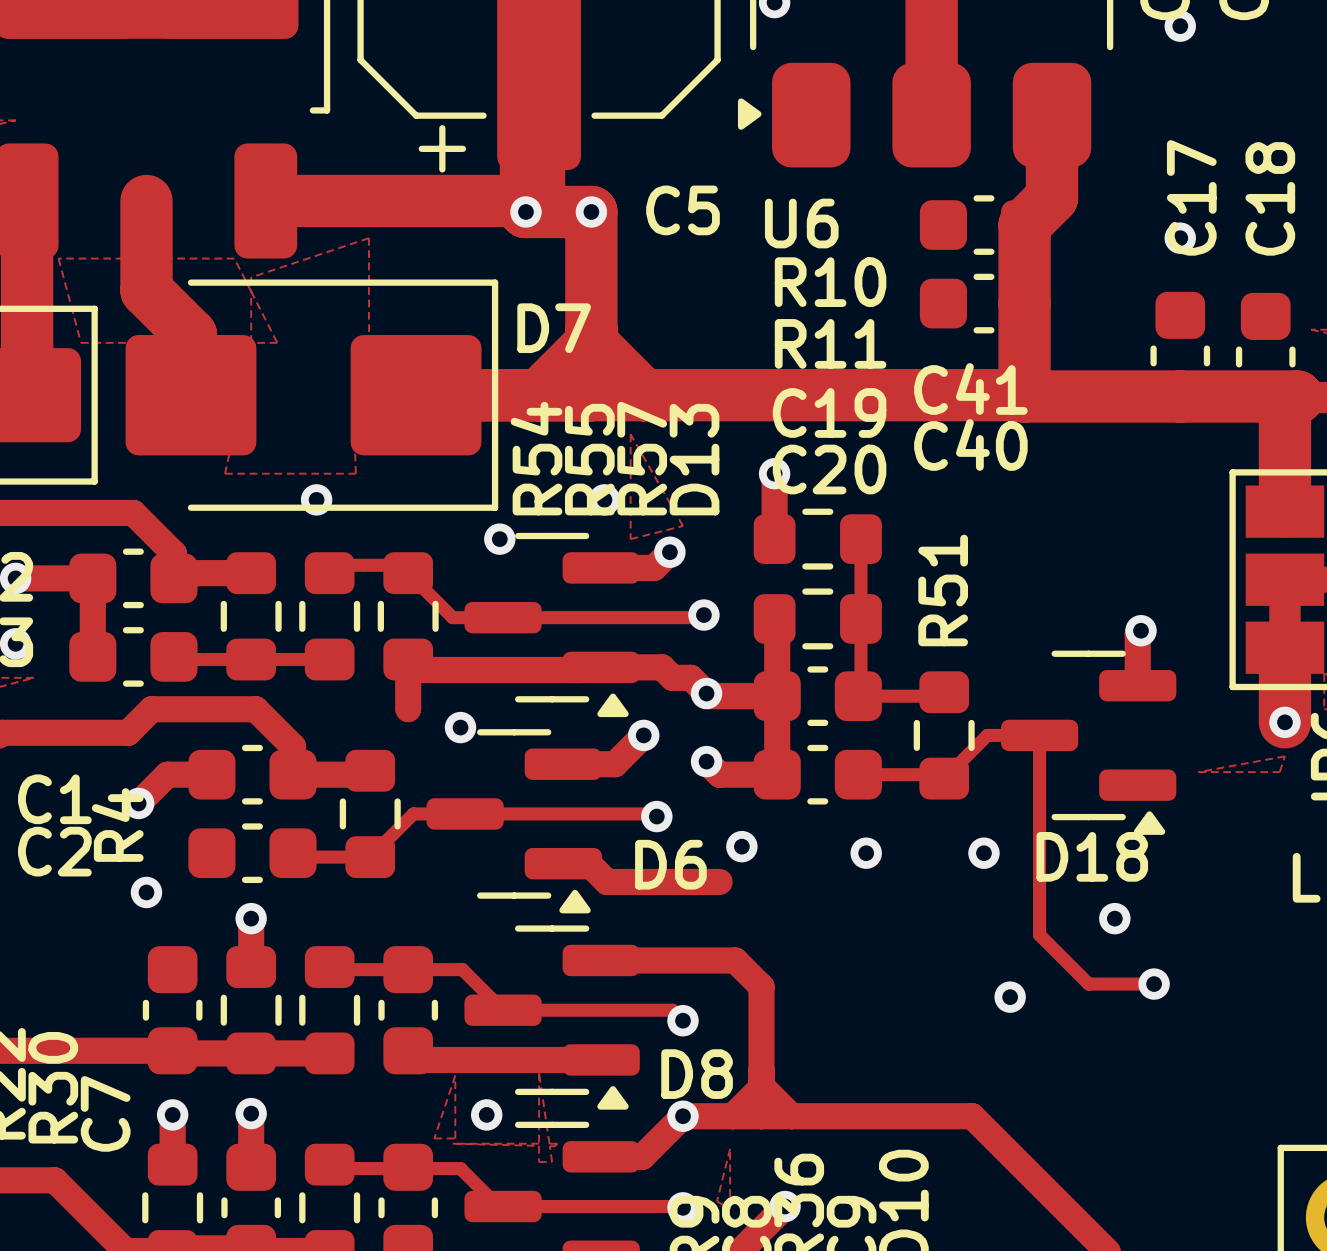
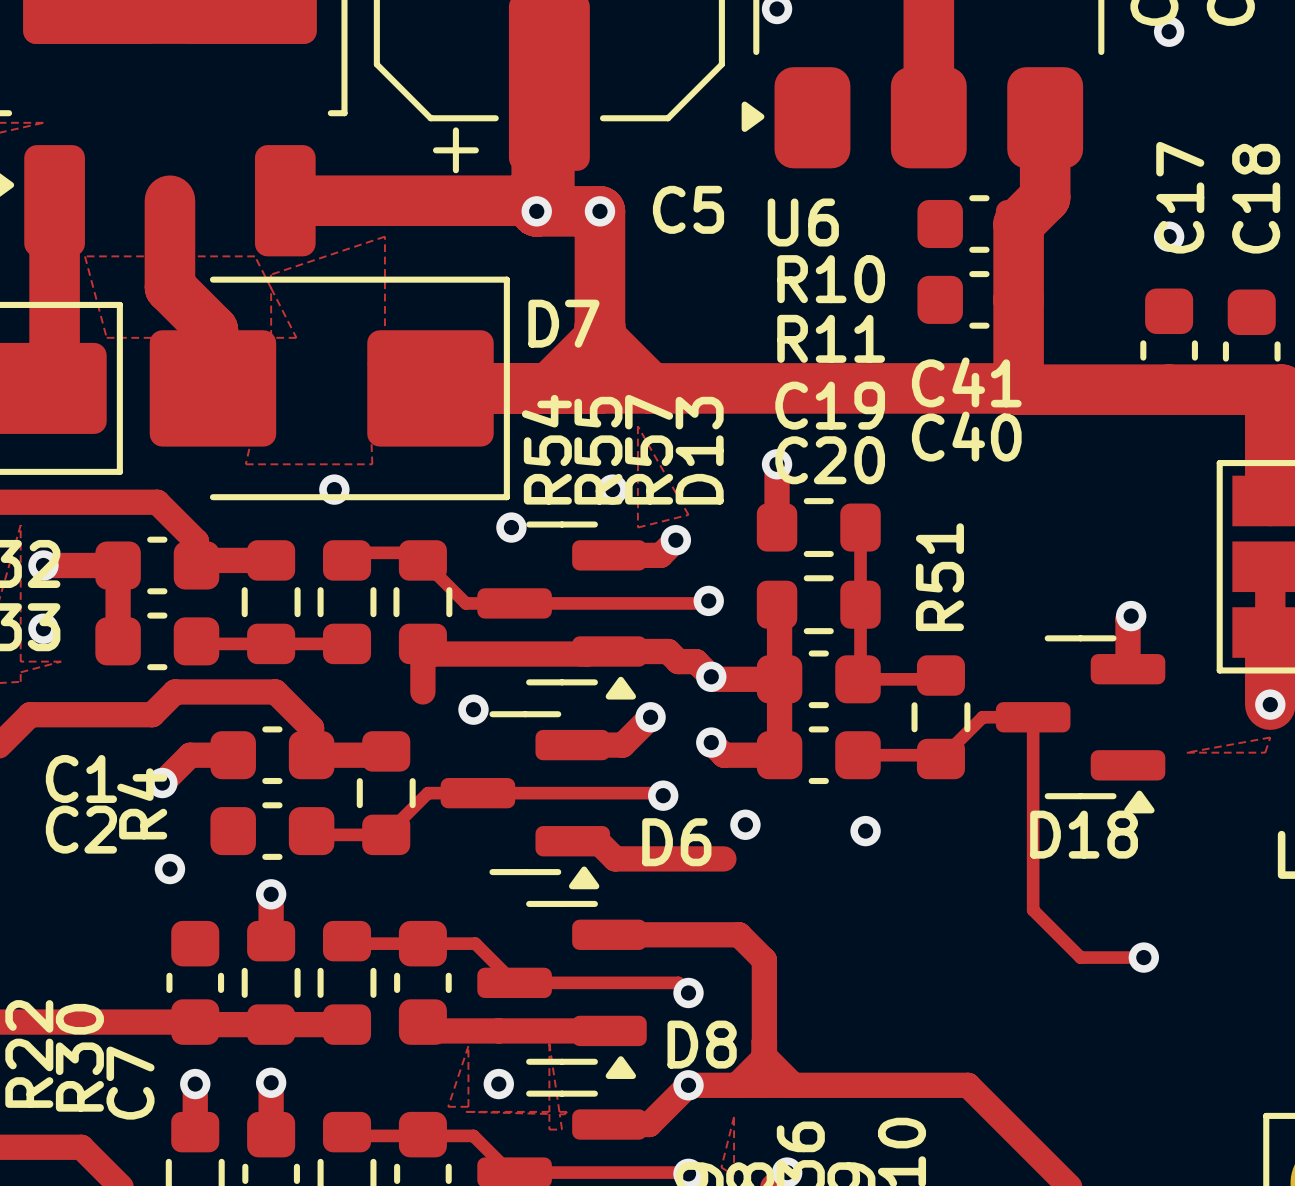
via: (983, 853) -> none
via: (1114, 918) -> none
via: (1010, 997) -> none

